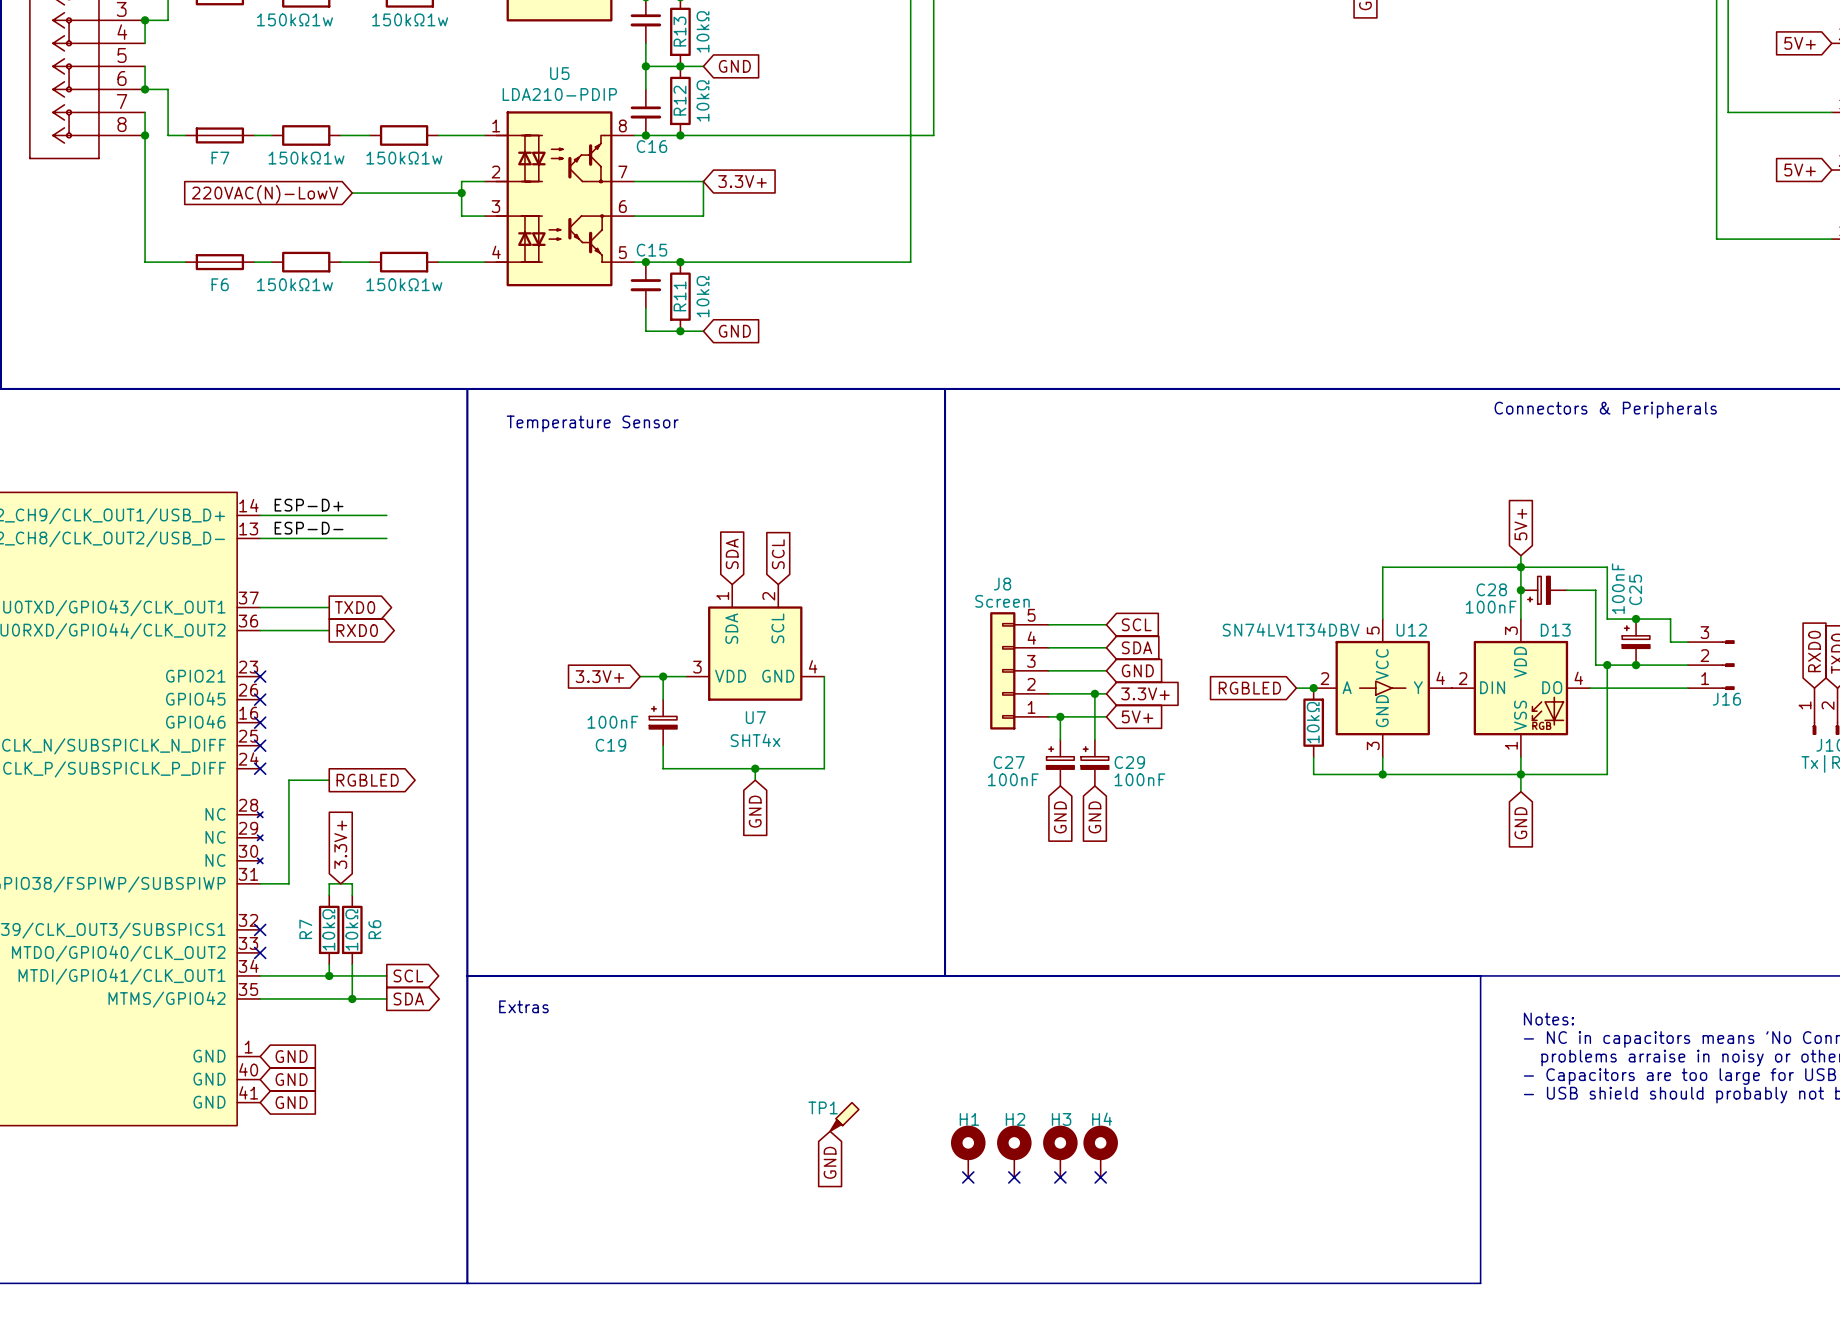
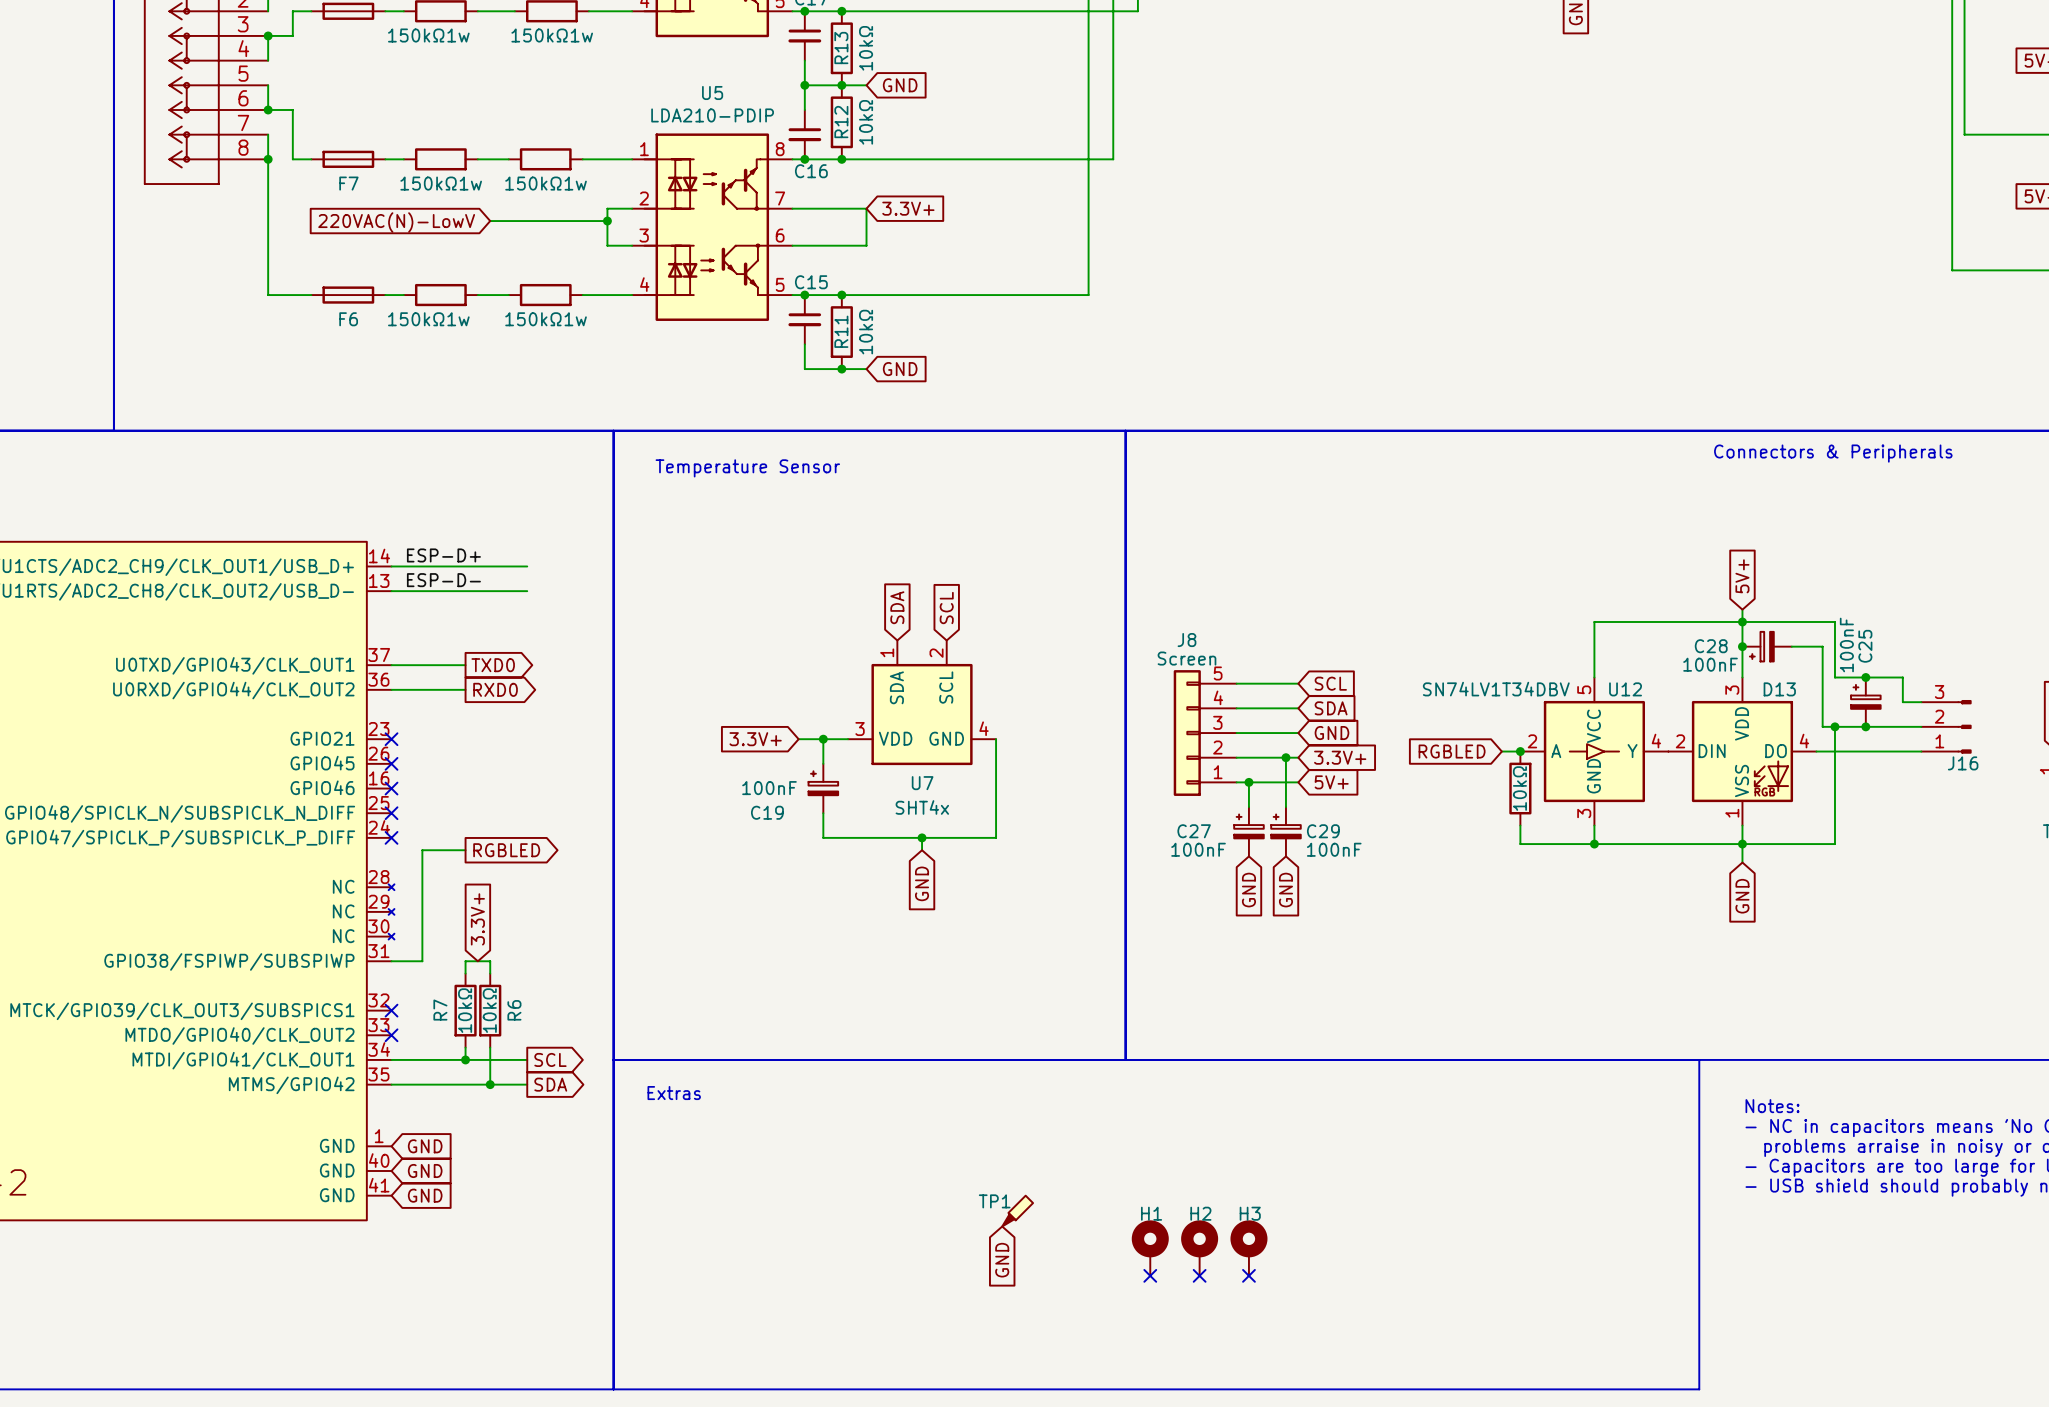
H4: (1100, 1151) -> none
no-connect mark: (1100, 1177) -> none

